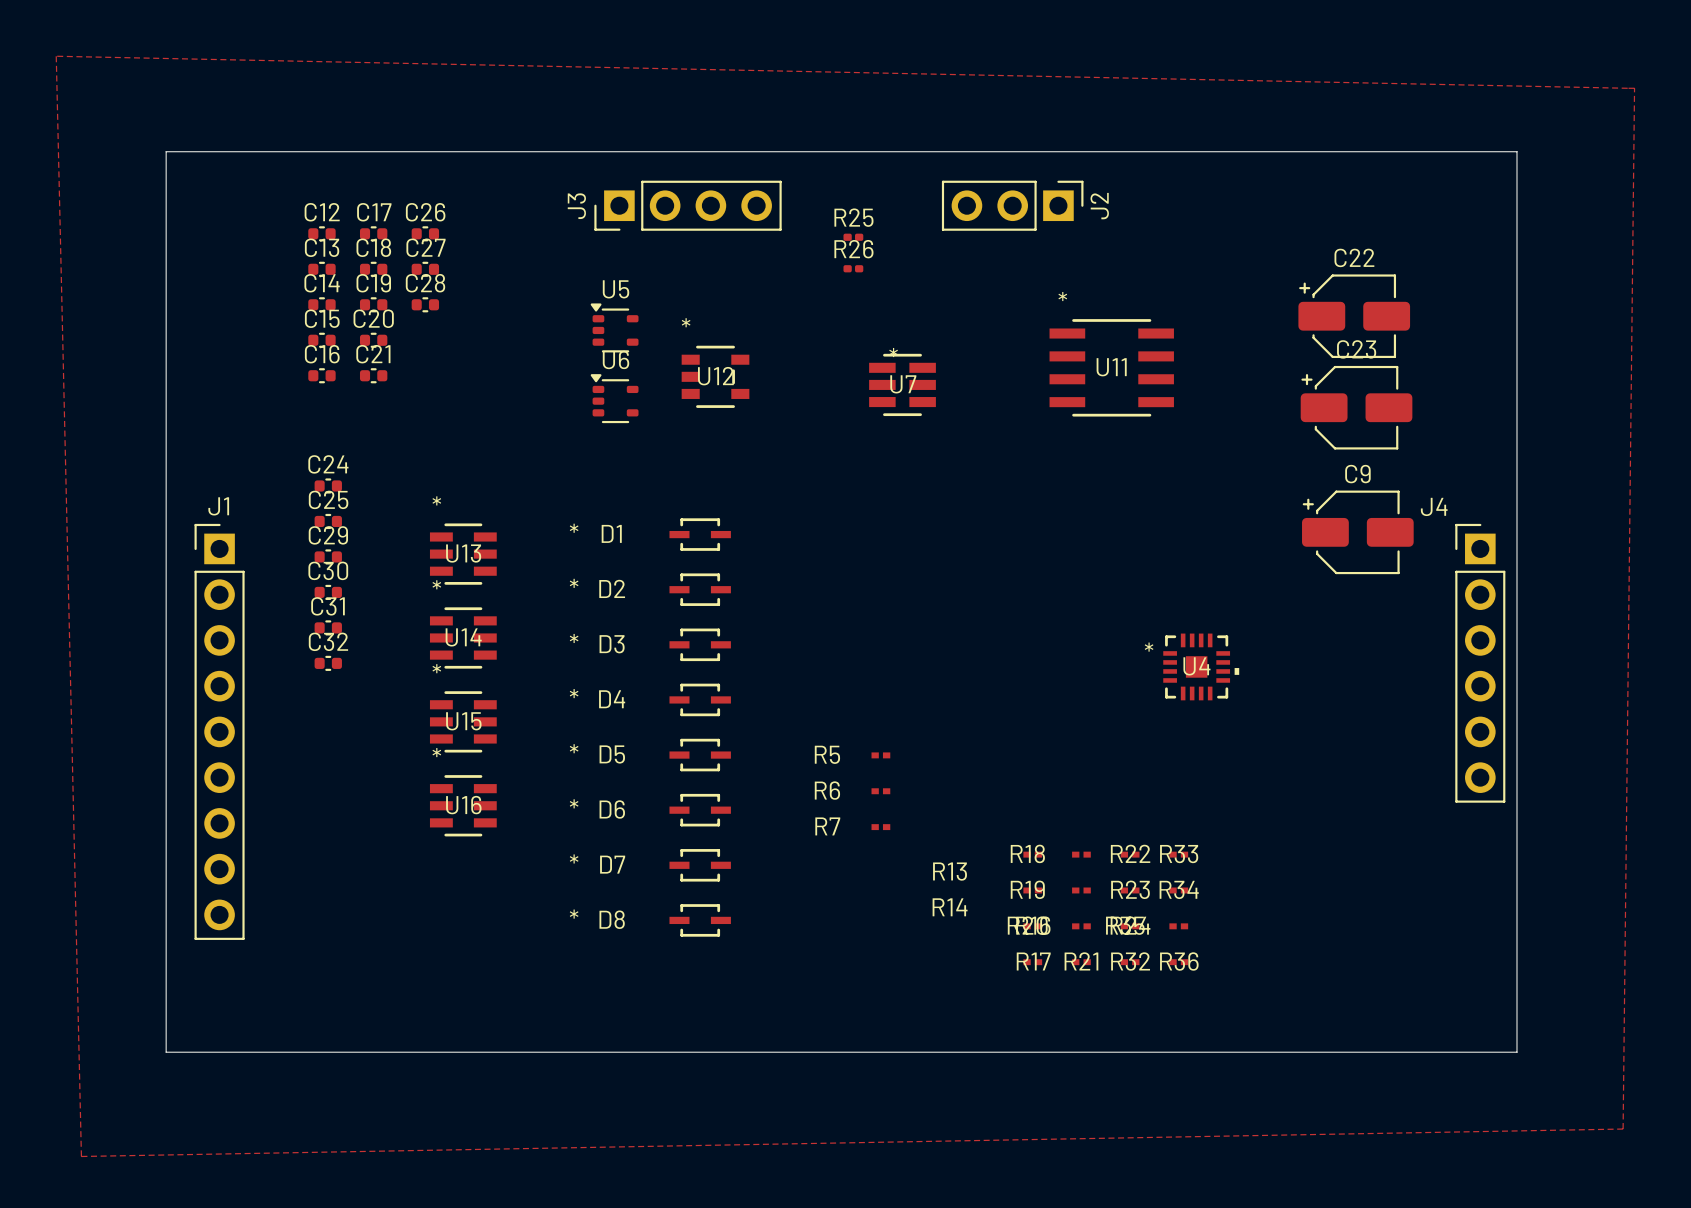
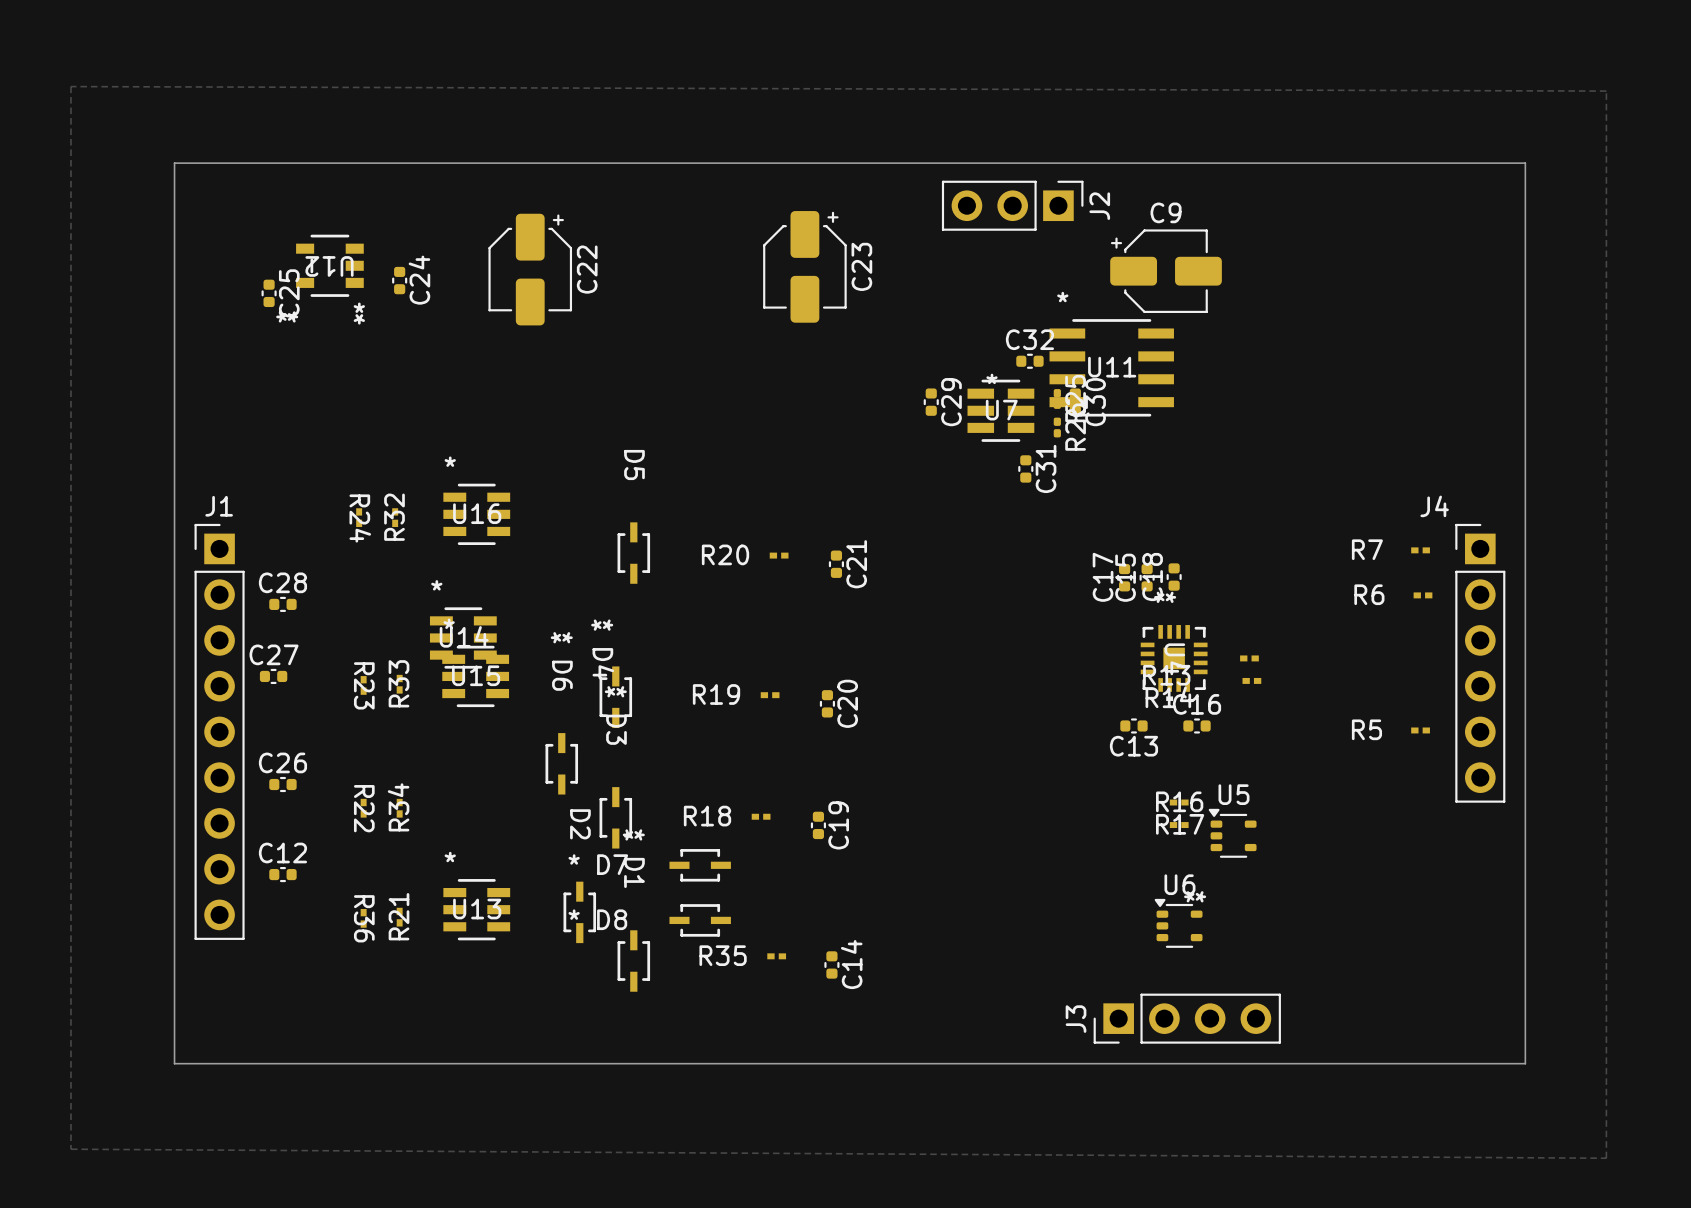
zone outline: (56, 56) (1634, 88) (1623, 1129) (81, 1156) (56, 56) -> (70, 86) (70, 1149) (1606, 1158) (1606, 91) (70, 86)
board edge: (166, 151) (1516, 151) (1516, 1052) (166, 1052) (166, 151) -> (174, 163) (1525, 163) (1525, 1063) (174, 1063) (174, 163)
J3 position: (688, 205) -> (1187, 1018)
C12 position: (321, 233) -> (282, 874)
C17 rotation: 0° (373, 233) -> 90° clockwise (1124, 577)
C17 position: (373, 233) -> (1124, 577)
C26 position: (425, 233) -> (282, 784)
R25 rotation: 0° (853, 237) -> 90° clockwise (1057, 398)
R25 position: (853, 237) -> (1057, 398)
C13 name position: C13 (322, 247) -> C13 (1133, 746)
R26 rotation: 0° (853, 268) -> 90° clockwise (1057, 427)
R26 position: (853, 268) -> (1057, 427)
C13 position: (321, 269) -> (1133, 725)
C18 rotation: 0° (373, 269) -> 90° clockwise (1174, 577)
C18 position: (373, 269) -> (1174, 577)
C27 position: (425, 269) -> (273, 676)
C14 rotation: 0° (321, 304) -> 90° clockwise (831, 964)
C14 position: (321, 304) -> (831, 964)
C19 rotation: 0° (373, 304) -> 90° clockwise (818, 825)
C19 position: (373, 304) -> (818, 825)
C28 position: (425, 304) -> (282, 604)
C22 rotation: 0° (1354, 316) -> 90° clockwise (530, 269)
C22 position: (1354, 316) -> (530, 269)
U5 position: (614, 327) -> (1232, 833)
C15 rotation: 0° (321, 340) -> 90° clockwise (1147, 577)
C15 position: (321, 340) -> (1147, 577)
C20 rotation: 0° (373, 340) -> 90° clockwise (827, 703)
C20 position: (373, 340) -> (827, 703)
C16 position: (321, 375) -> (1197, 725)
C21 rotation: 0° (373, 375) -> 90° clockwise (836, 564)
C21 position: (373, 375) -> (836, 564)
U12 rotation: 0° (715, 376) -> 180° (329, 265)
U12 position: (715, 376) -> (329, 265)
U7 position: (902, 384) -> (1000, 410)
U6 position: (614, 398) -> (1178, 923)
C23 rotation: 0° (1356, 407) -> 90° clockwise (804, 266)
C23 position: (1356, 407) -> (804, 266)
C24 rotation: 0° (328, 485) -> 90° clockwise (399, 280)
C24 position: (328, 485) -> (399, 280)
C25 rotation: 0° (328, 521) -> 90° clockwise (269, 293)
C25 position: (328, 521) -> (269, 293)
C9 position: (1357, 532) -> (1166, 271)
D1 rotation: 0° (700, 534) -> 90° clockwise (633, 961)
D1 position: (700, 534) -> (633, 961)
U13 position: (463, 554) -> (476, 909)
C29 rotation: 0° (328, 556) -> 90° clockwise (931, 402)
C29 position: (328, 556) -> (931, 402)
D2 footprint: [669, 573, 731, 606] -> [563, 881, 597, 944]
D2 name position: D2 (612, 588) -> D2 (580, 824)
C30 rotation: 0° (328, 592) -> 90° clockwise (1075, 402)
C30 position: (328, 592) -> (1075, 402)
C31 rotation: 0° (328, 627) -> 90° clockwise (1025, 468)
C31 position: (328, 627) -> (1025, 468)
U4 footprint: [1163, 633, 1240, 701] -> [1140, 625, 1208, 701]
D3 rotation: 0° (700, 644) -> 90° clockwise (615, 817)
D3 position: (700, 644) -> (615, 817)
C32 position: (328, 663) -> (1029, 361)
D4 footprint: [669, 683, 731, 717] -> [599, 666, 633, 728]
D4 name position: D4 (612, 699) -> D4 (603, 663)
U15 position: (463, 721) -> (475, 676)
D5 footprint: [669, 738, 731, 772] -> [617, 522, 651, 584]
D5 name position: D5 (612, 754) -> D5 (634, 465)
R5 position: (880, 755) -> (1420, 730)
R6 position: (880, 791) -> (1423, 595)
U16 position: (463, 805) -> (476, 514)
D6 rotation: 0° (700, 810) -> 90° clockwise (561, 763)
D6 position: (700, 810) -> (561, 763)
R7 position: (880, 827) -> (1420, 550)
R13 position: (1032, 854) -> (1249, 658)
R18 position: (1081, 854) -> (761, 816)
R22 rotation: 0° (1130, 854) -> 90° clockwise (363, 808)
R22 position: (1130, 854) -> (363, 808)
R33 rotation: 0° (1178, 854) -> 90° clockwise (399, 684)
R33 position: (1178, 854) -> (399, 684)
R14 position: (1032, 890) -> (1251, 680)
R19 position: (1081, 890) -> (770, 695)
R23 rotation: 0° (1130, 890) -> 90° clockwise (363, 685)
R23 position: (1130, 890) -> (363, 685)
R34 rotation: 0° (1178, 890) -> 90° clockwise (399, 808)
R34 position: (1178, 890) -> (399, 808)
R16 position: (1032, 926) -> (1179, 802)
R20 position: (1081, 926) -> (779, 555)
R24 rotation: 0° (1130, 926) -> 90° clockwise (359, 517)
R24 position: (1130, 926) -> (359, 517)
R35 position: (1178, 926) -> (776, 956)
R17 position: (1032, 962) -> (1179, 825)
R21 rotation: 0° (1081, 962) -> 90° clockwise (399, 917)
R21 position: (1081, 962) -> (399, 917)
R32 rotation: 0° (1130, 962) -> 90° clockwise (395, 517)
R32 position: (1130, 962) -> (395, 517)
R36 rotation: 0° (1178, 962) -> 90° clockwise (363, 918)
R36 position: (1178, 962) -> (363, 918)

